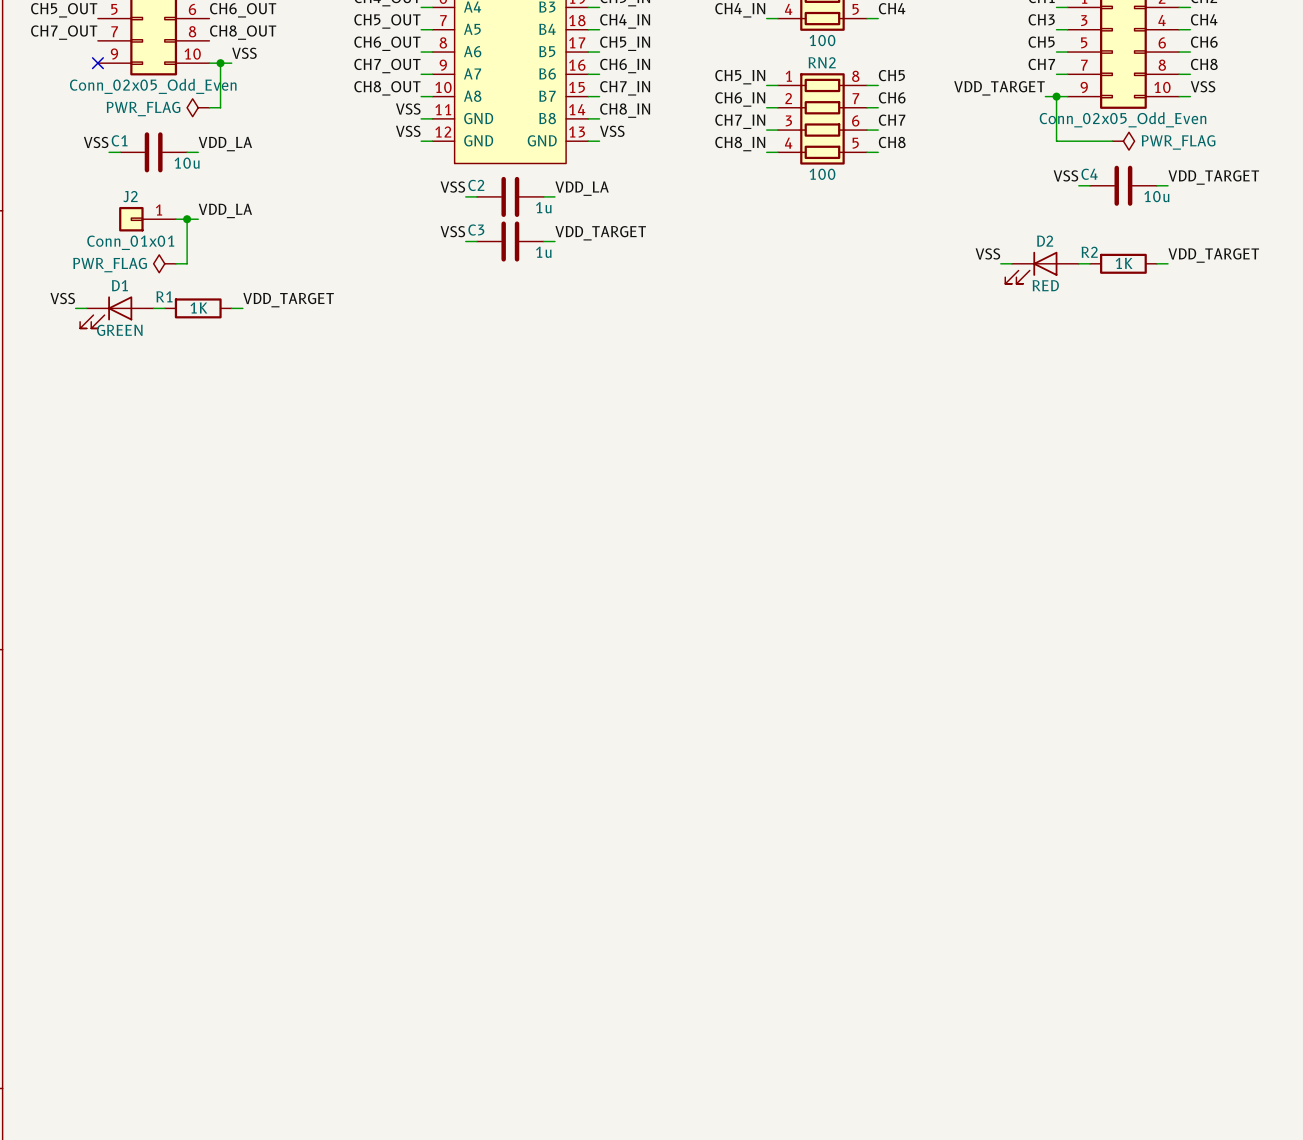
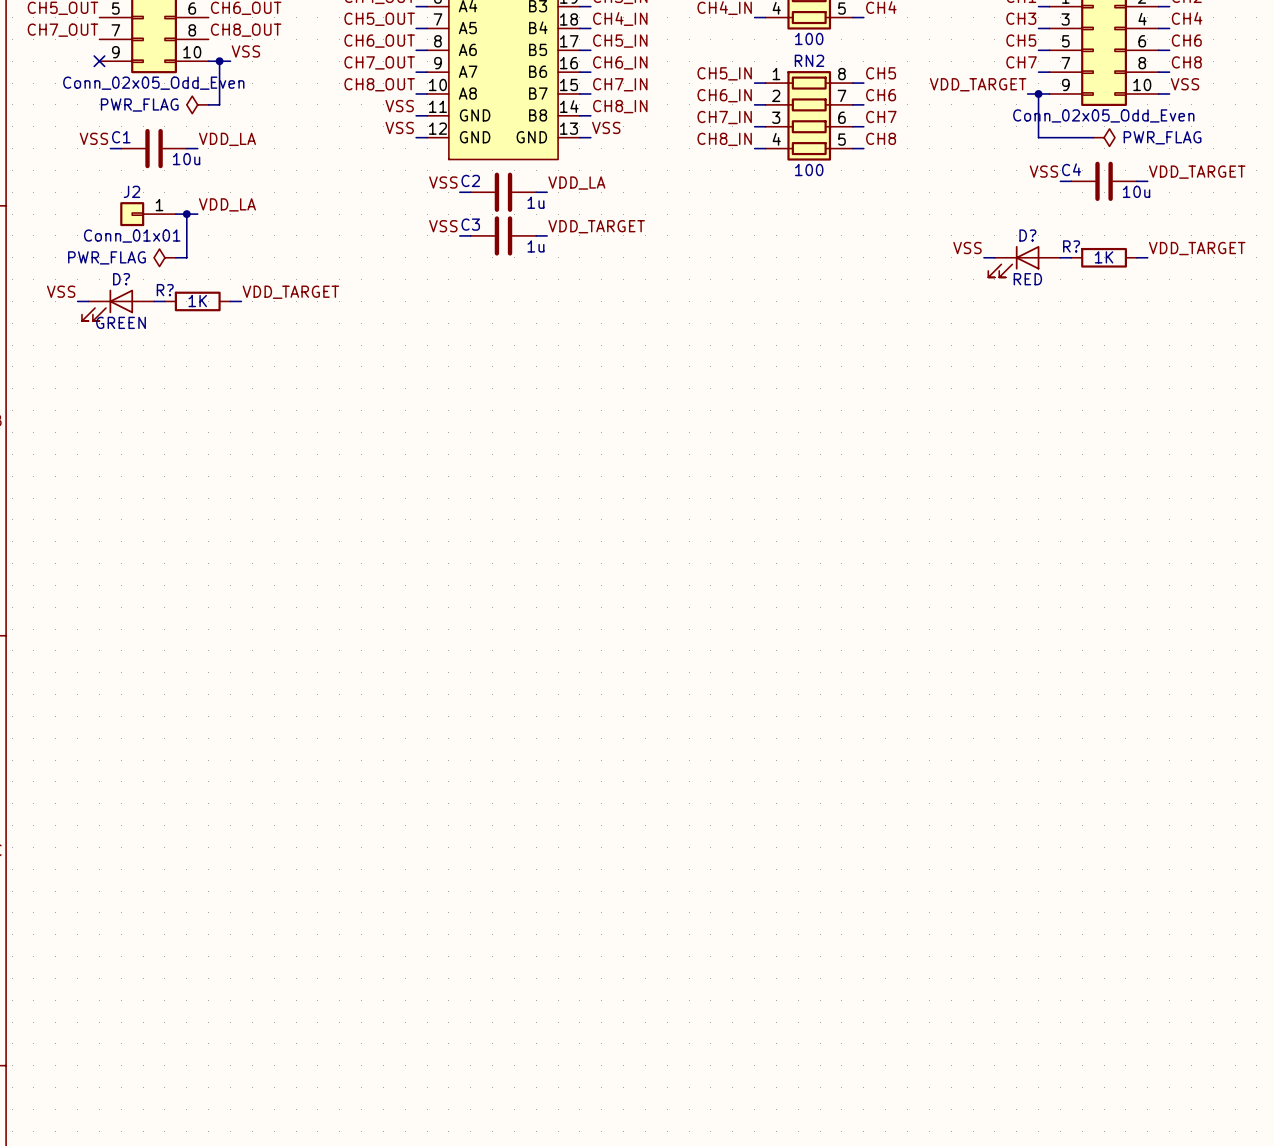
D2 name: D2 (1045, 241) -> D? (1027, 235)
R2 name: R2 (1089, 252) -> R? (1071, 246)
D1 name: D1 (119, 285) -> D? (121, 279)
R1 name: R1 (164, 296) -> R? (165, 290)

